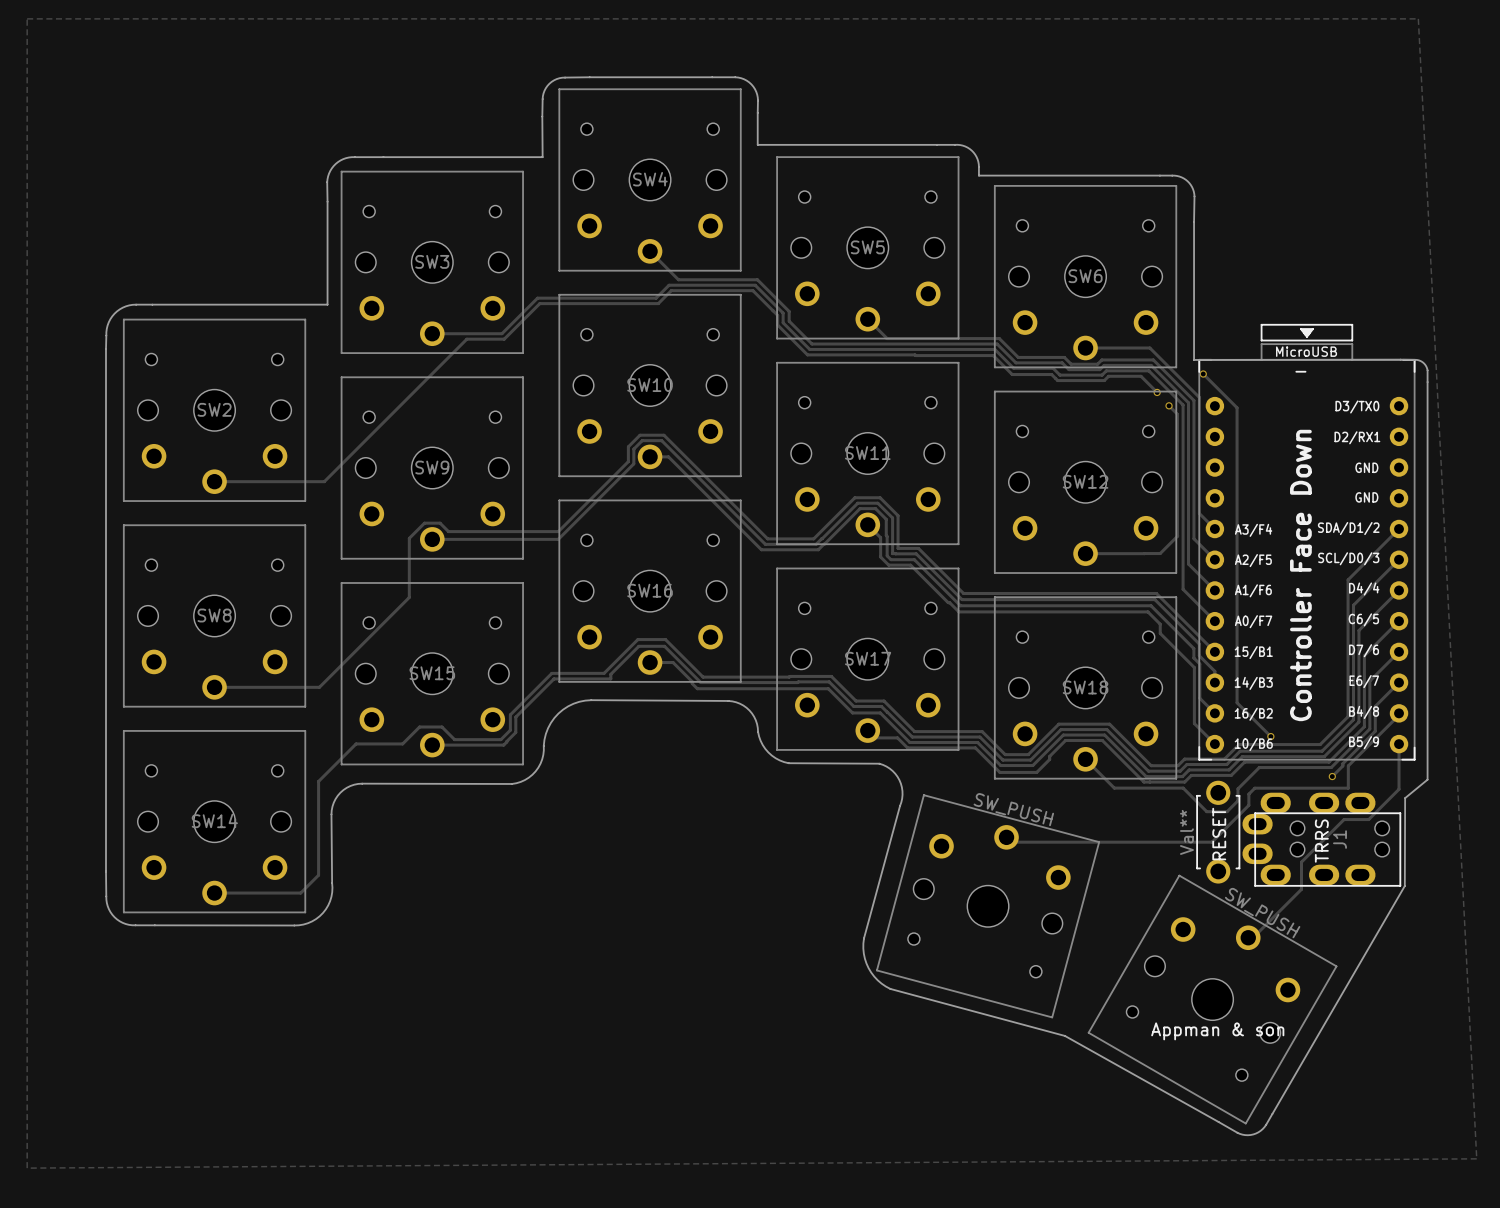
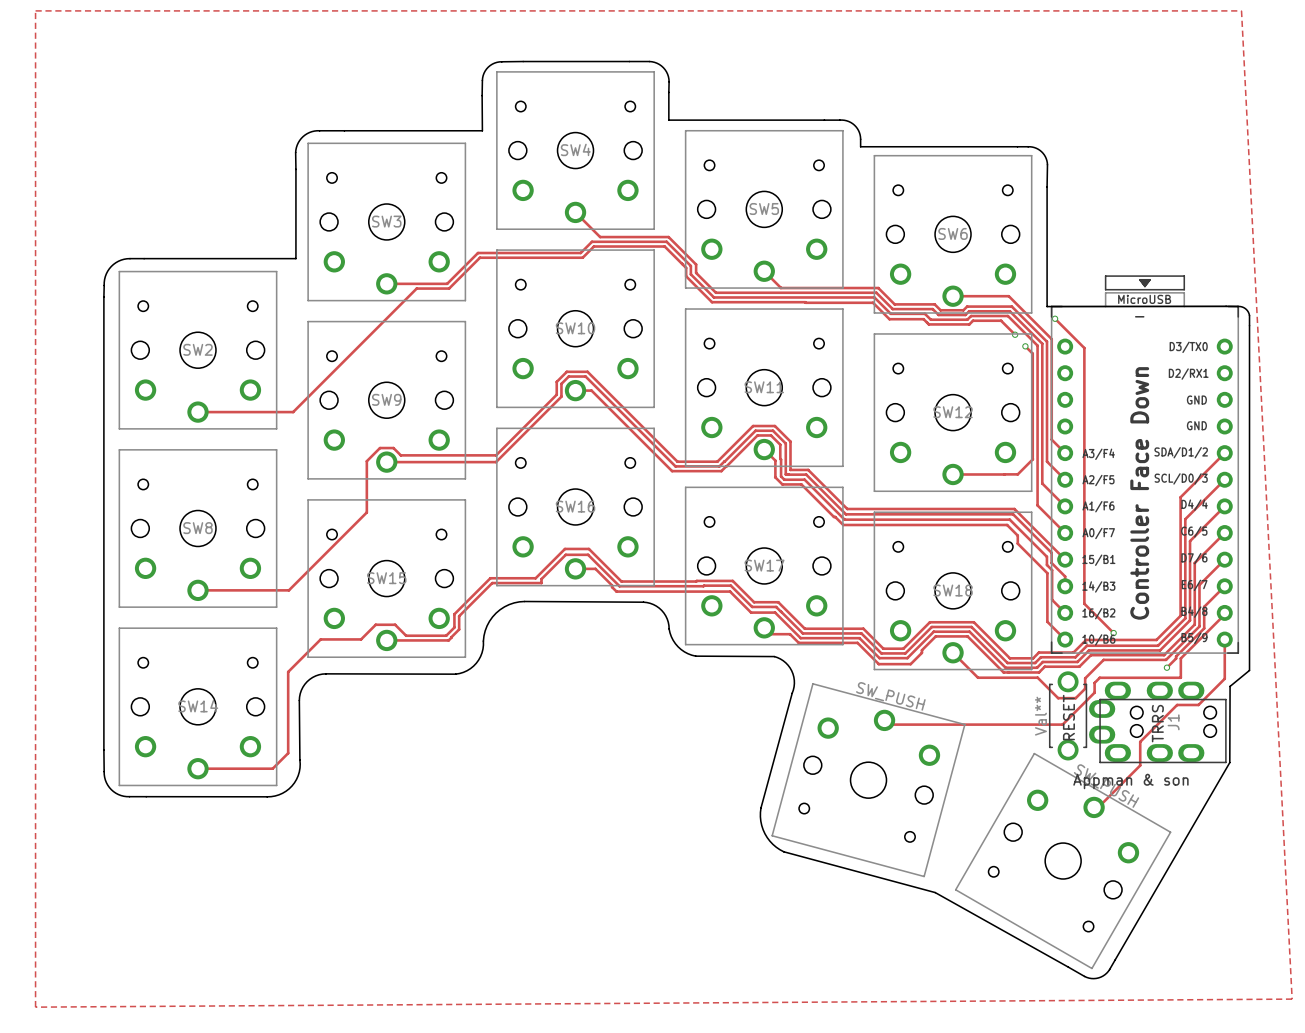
text position: Appman & son (1217, 1031) -> Appman & son (1130, 781)

